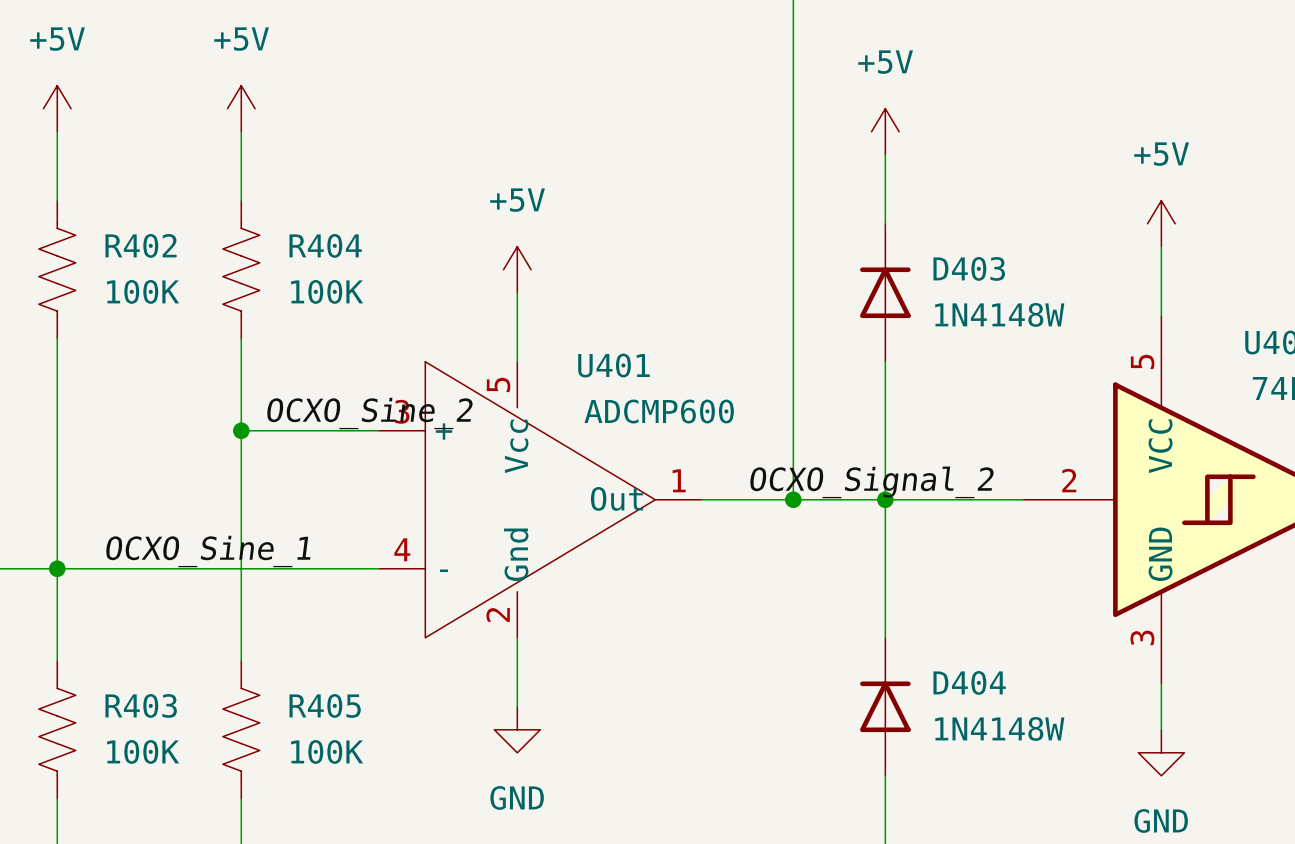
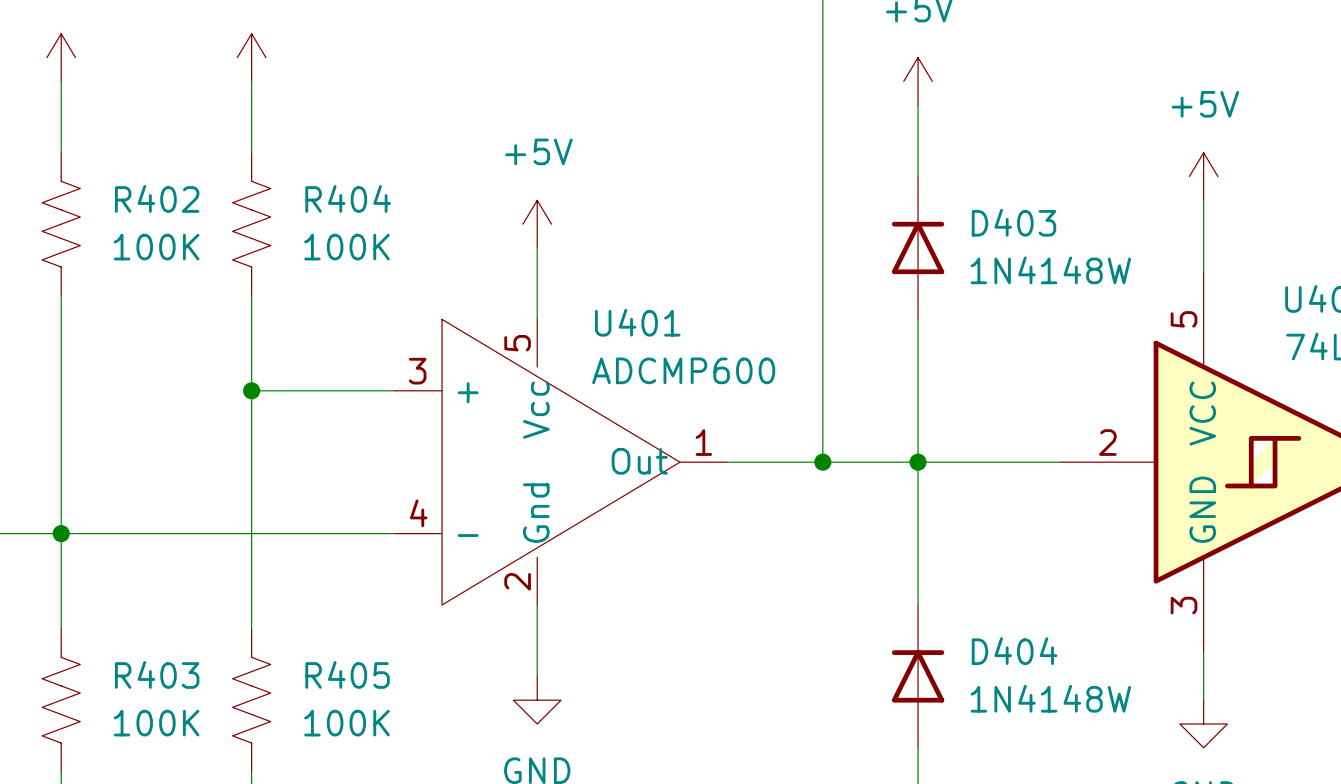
label: OCXO_Sine_2 (369, 413) -> none
label: OCXO_Signal_2 (871, 482) -> none
label: OCXO_Sine_1 (208, 551) -> none

